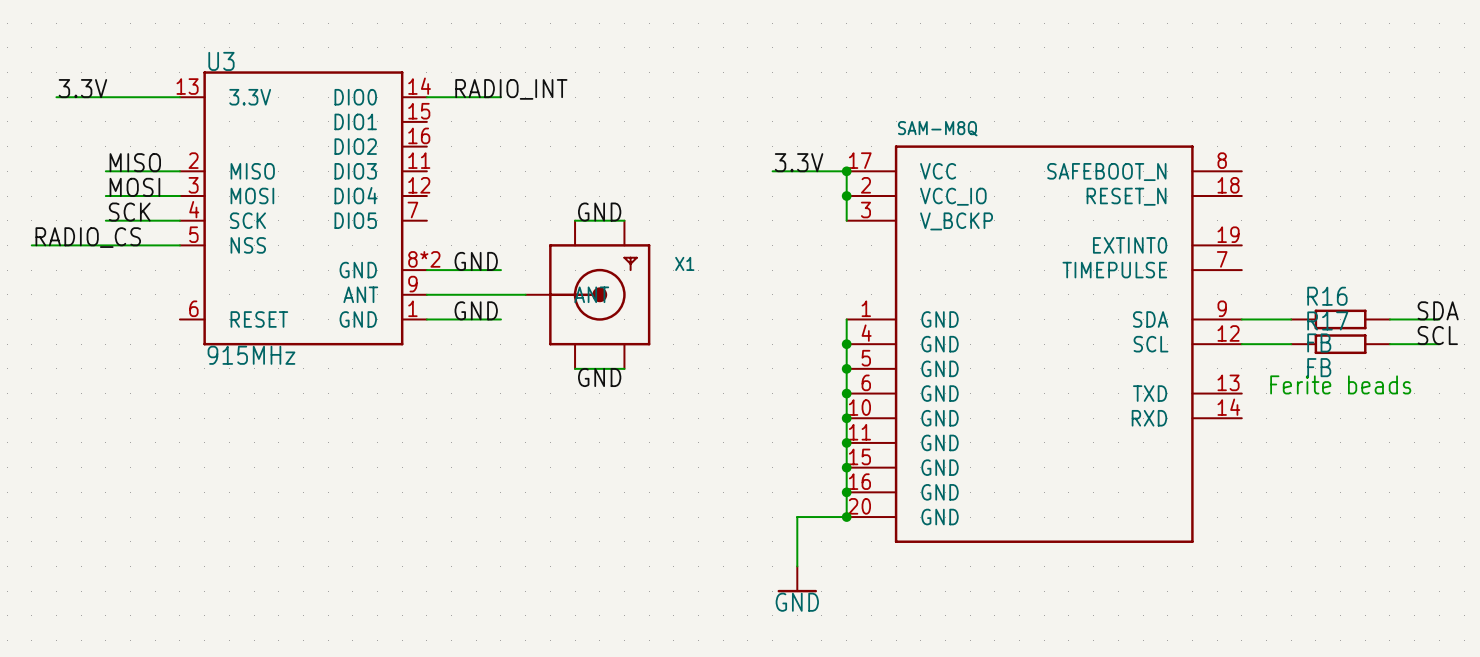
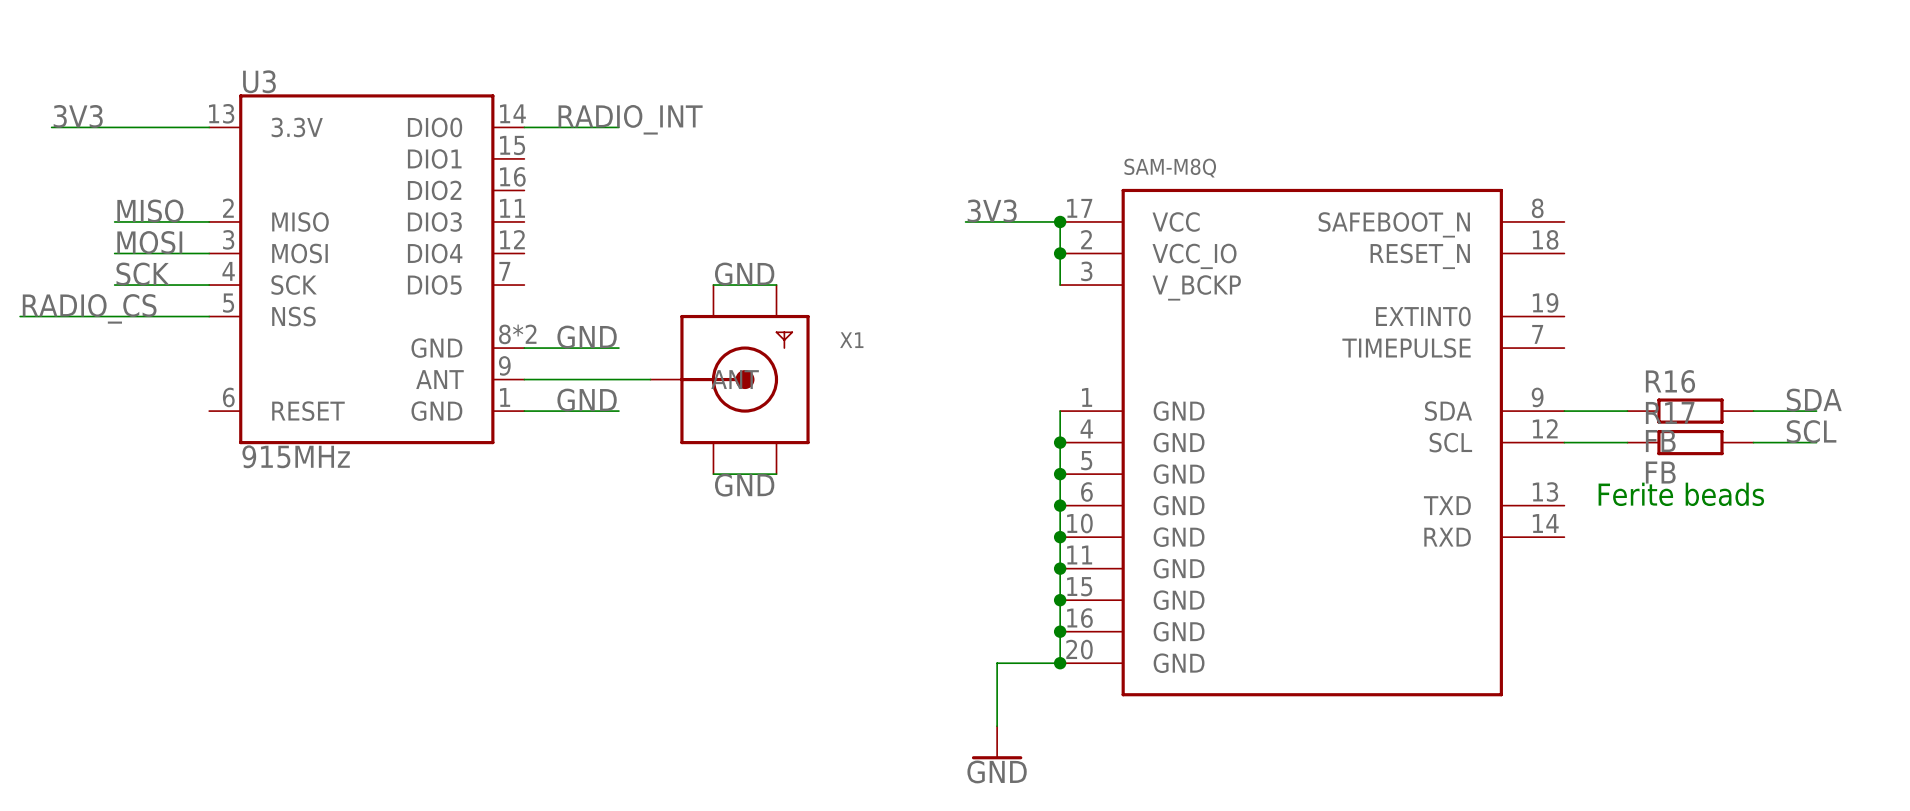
label: 3.3V (82, 88) -> 3V3 (78, 116)
label: 3.3V (799, 162) -> 3V3 (992, 210)

